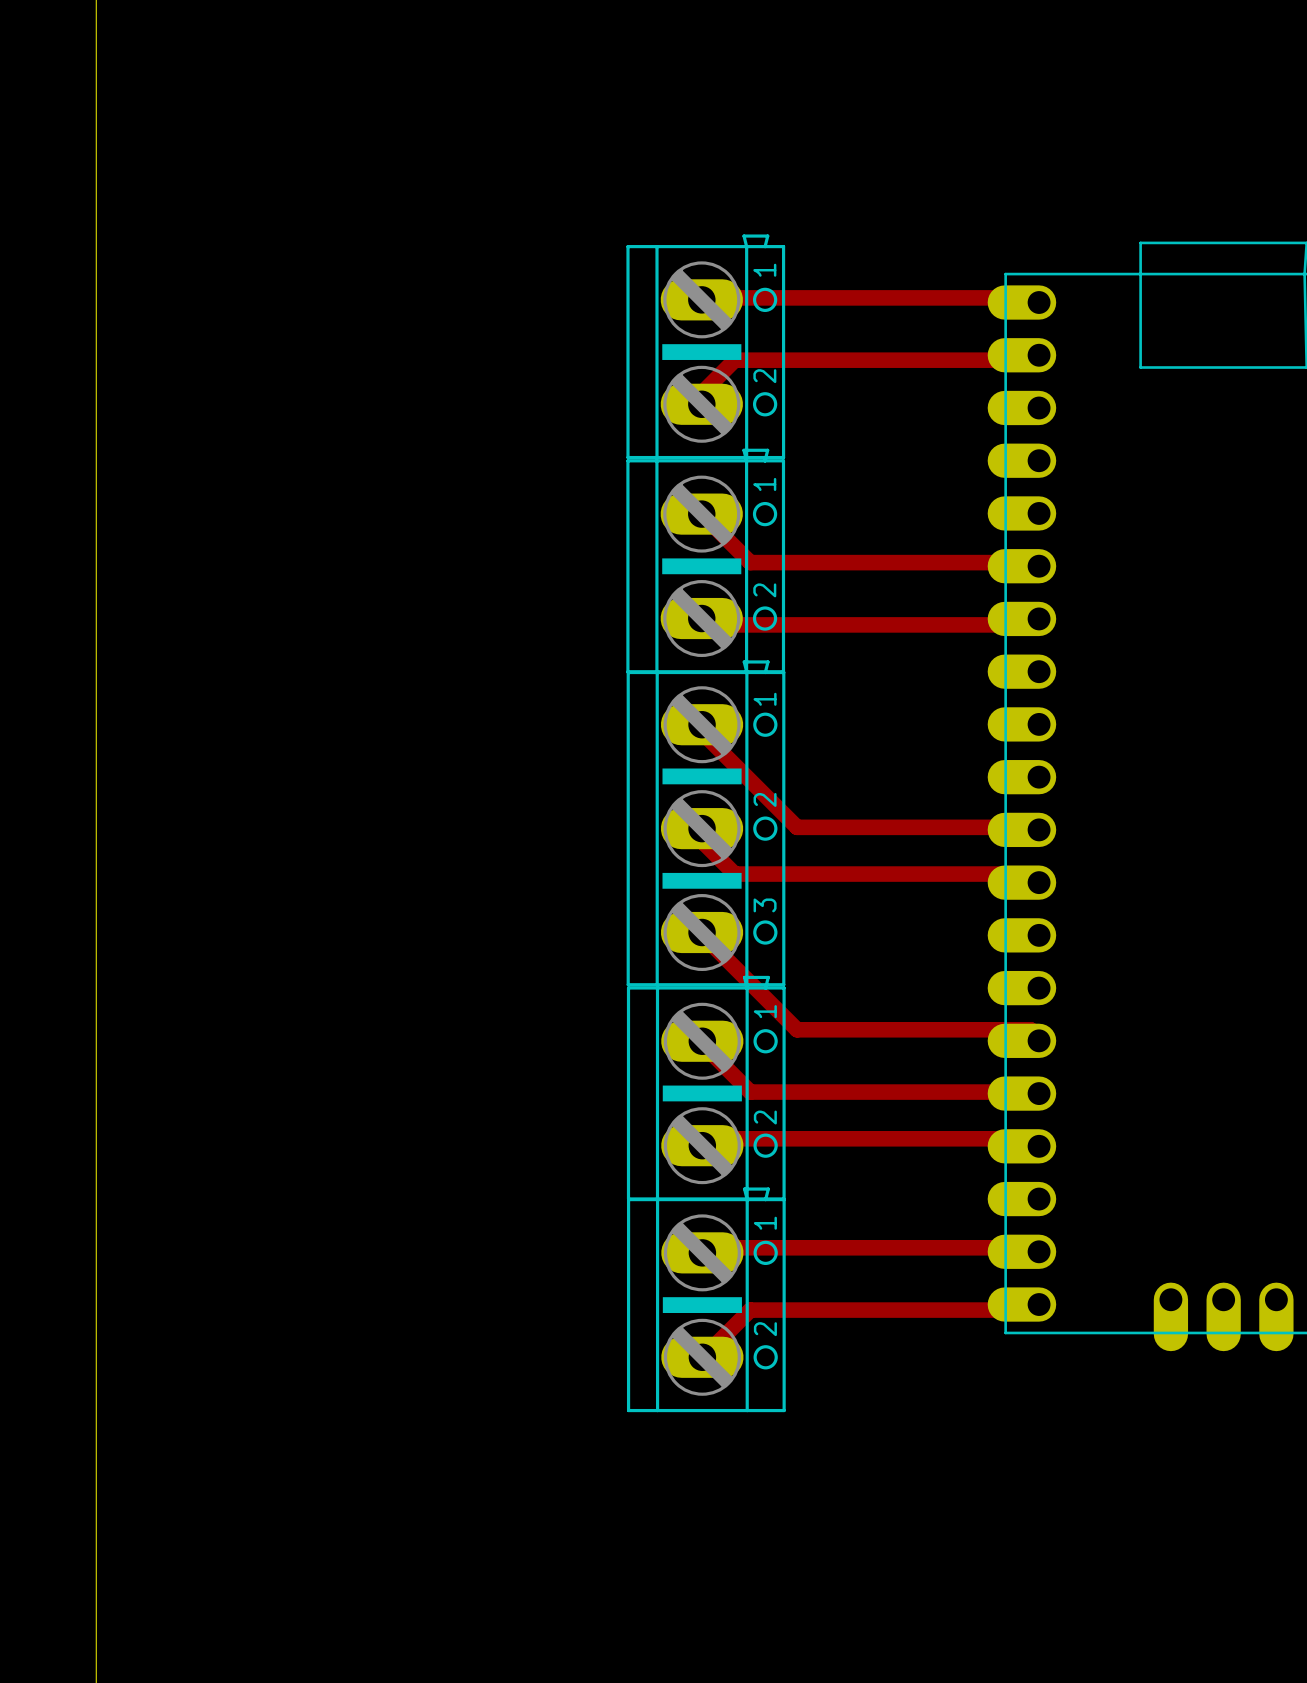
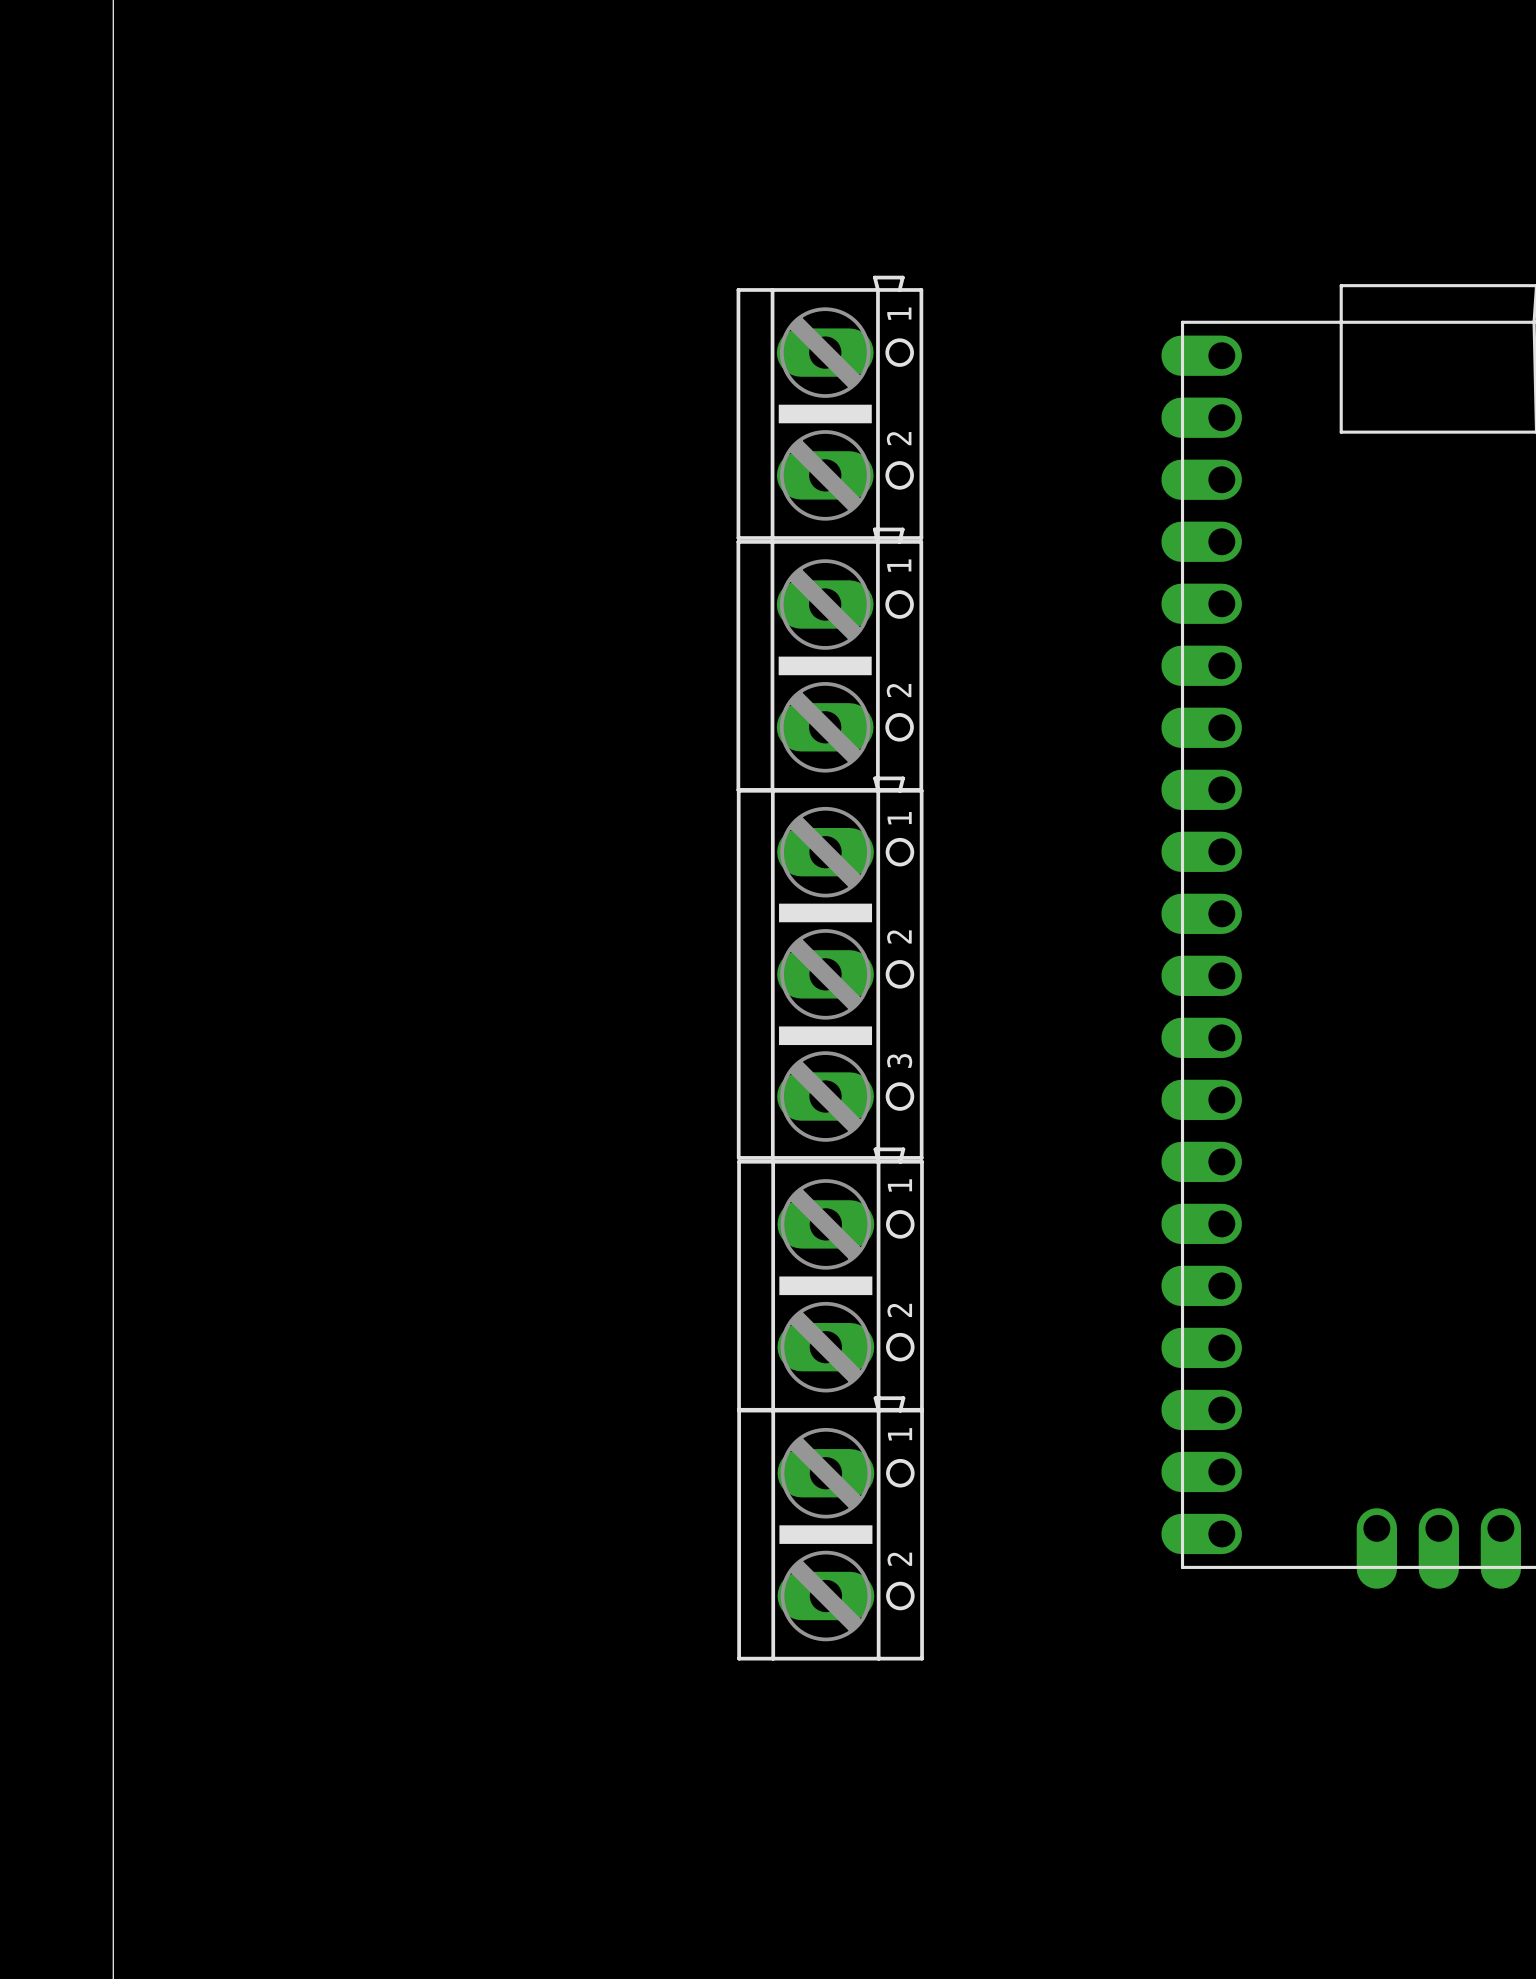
track: (701, 299) (703, 297) (1030, 297) (1039, 302) -> none
track: (1039, 355) (1030, 360) (734, 360) (703, 391) (701, 404) -> none
track: (701, 514) (750, 562) (1030, 562) (1039, 566) -> none
track: (701, 618) (703, 624) (1030, 624) (1039, 618) -> none
track: (703, 733) (797, 827) (1030, 827) (1039, 829) -> none
track: (702, 828) (703, 842) (734, 874) (1030, 874) (1039, 882) -> none
track: (702, 932) (703, 936) (797, 1029) (1030, 1029) (1039, 1040) -> none
track: (702, 1041) (703, 1045) (750, 1092) (1039, 1093) -> none
track: (702, 1145) (703, 1138) (1030, 1138) (1039, 1146) -> none
track: (1039, 1251) (1030, 1247) (703, 1247) (702, 1252) -> none
track: (1039, 1304) (1030, 1310) (750, 1310) (702, 1357) -> none

